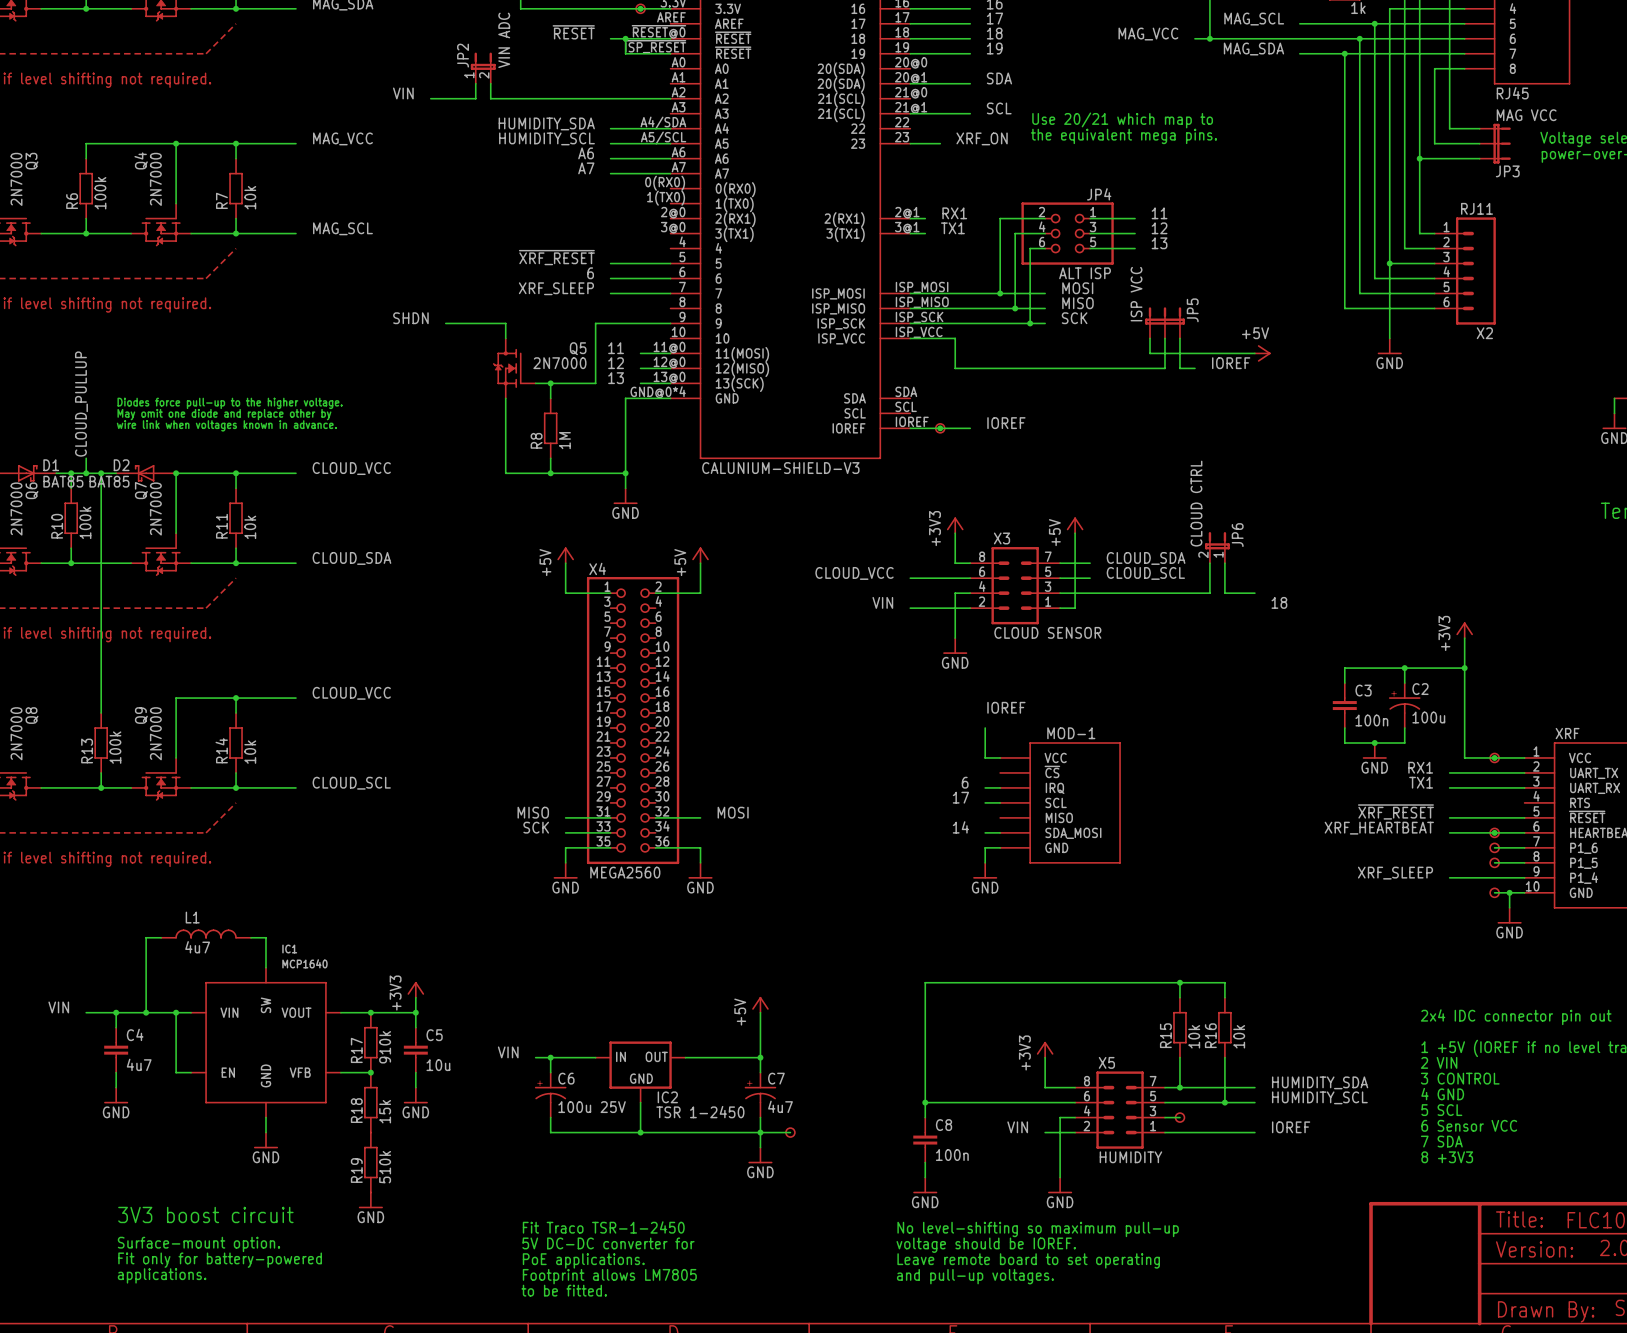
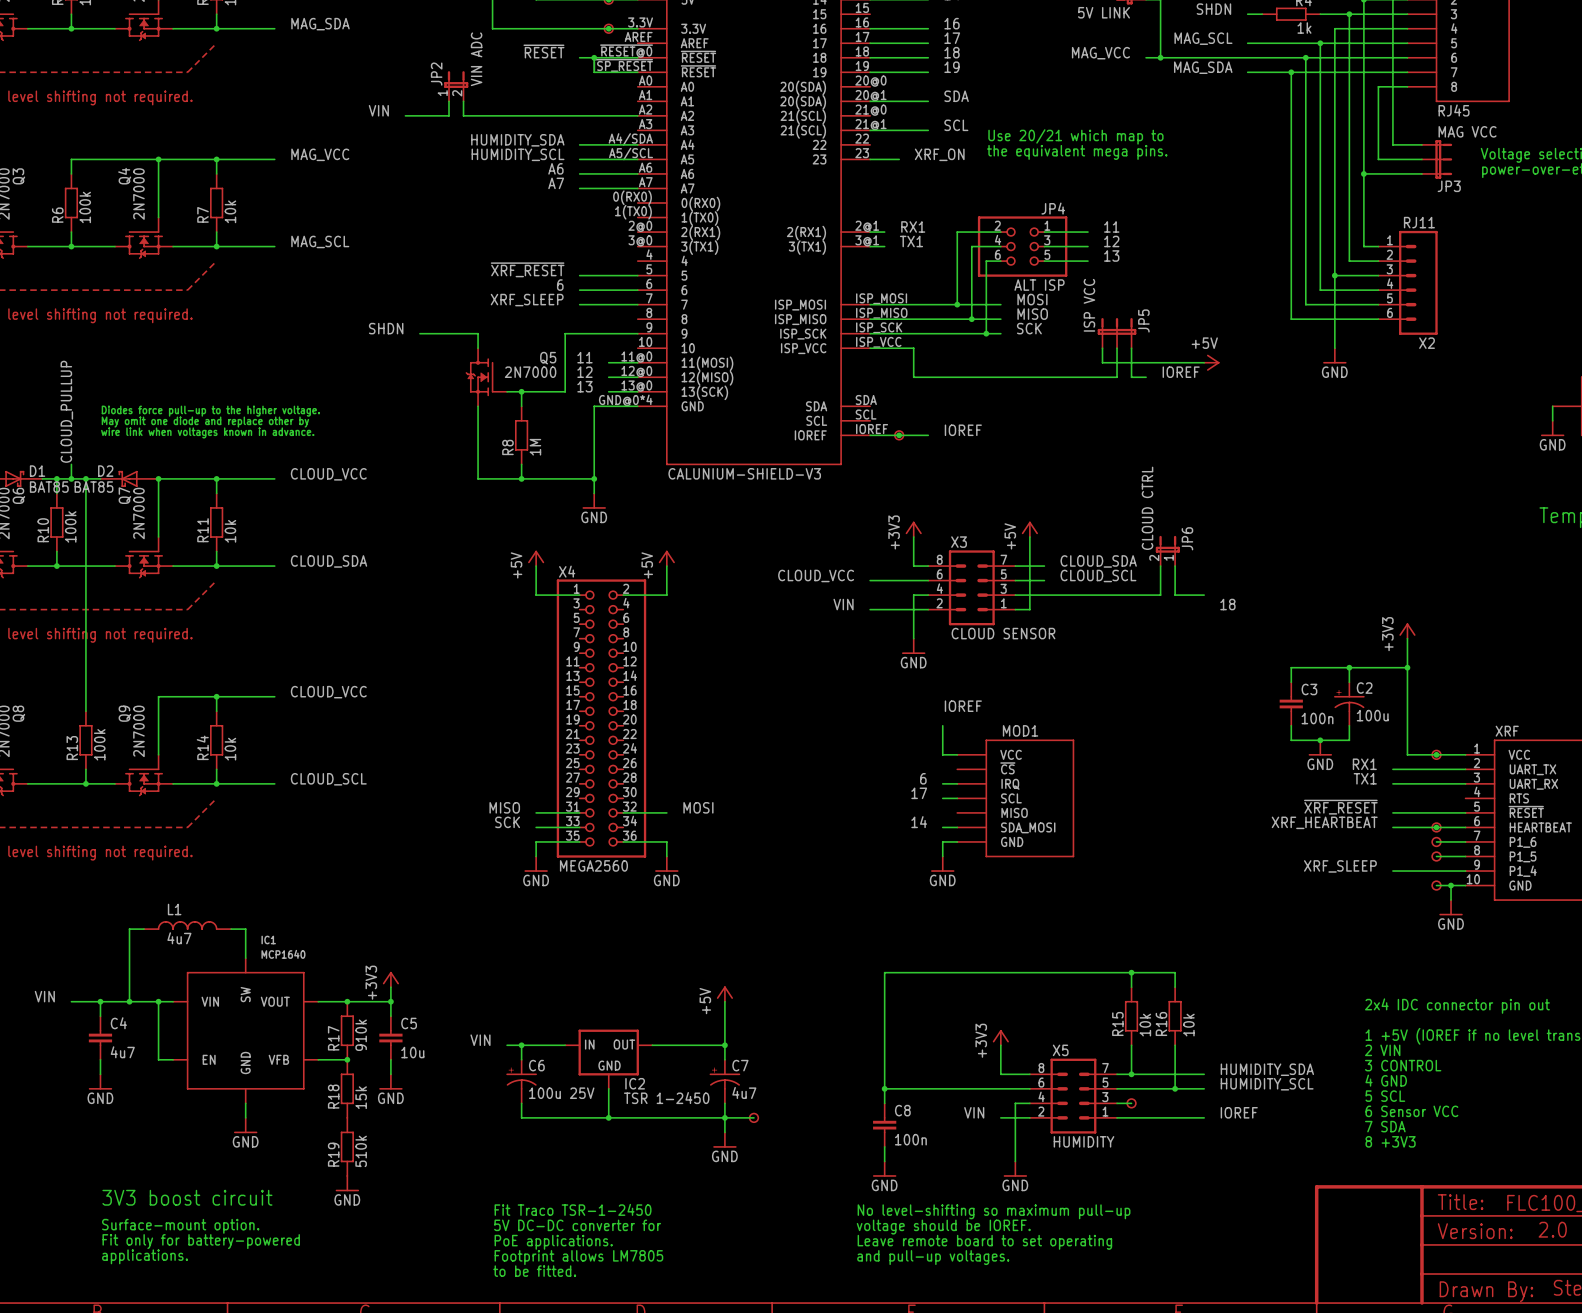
MOD-1 name: MOD-1 (1071, 733) -> MOD1 (1020, 730)

